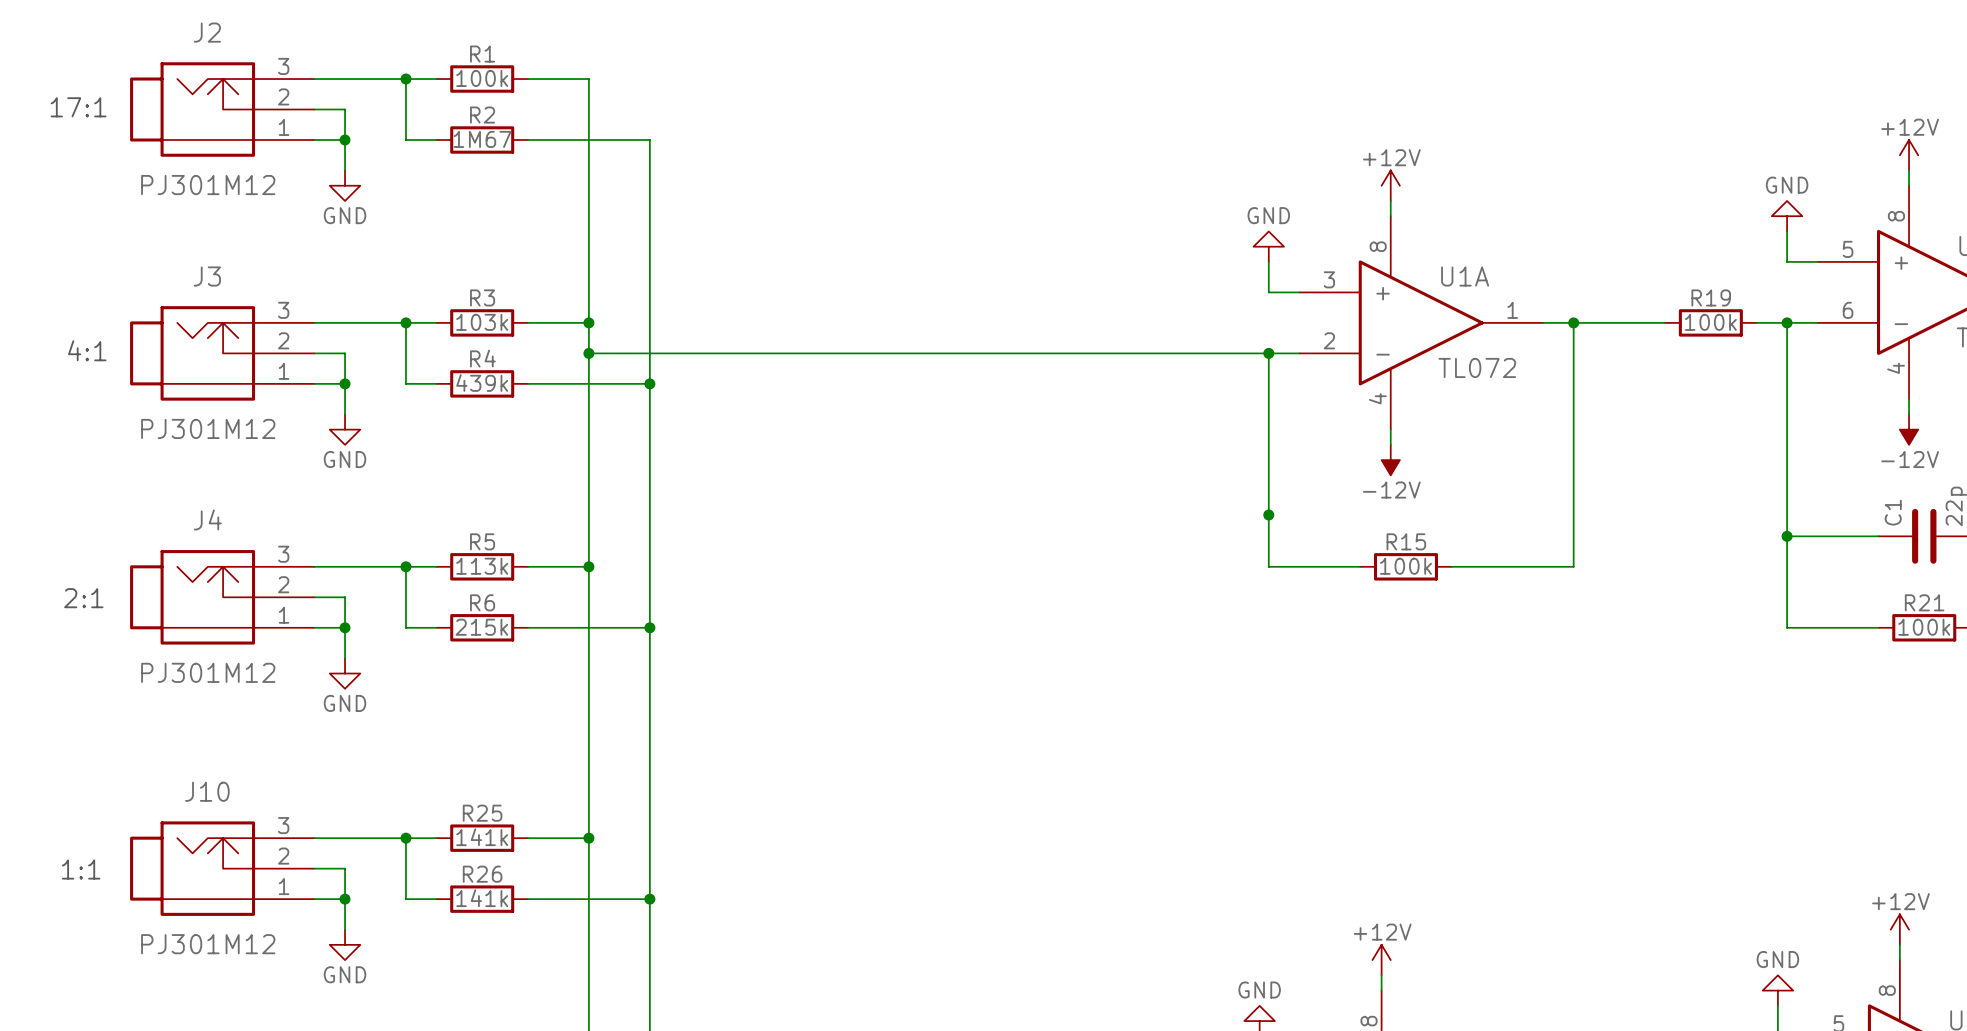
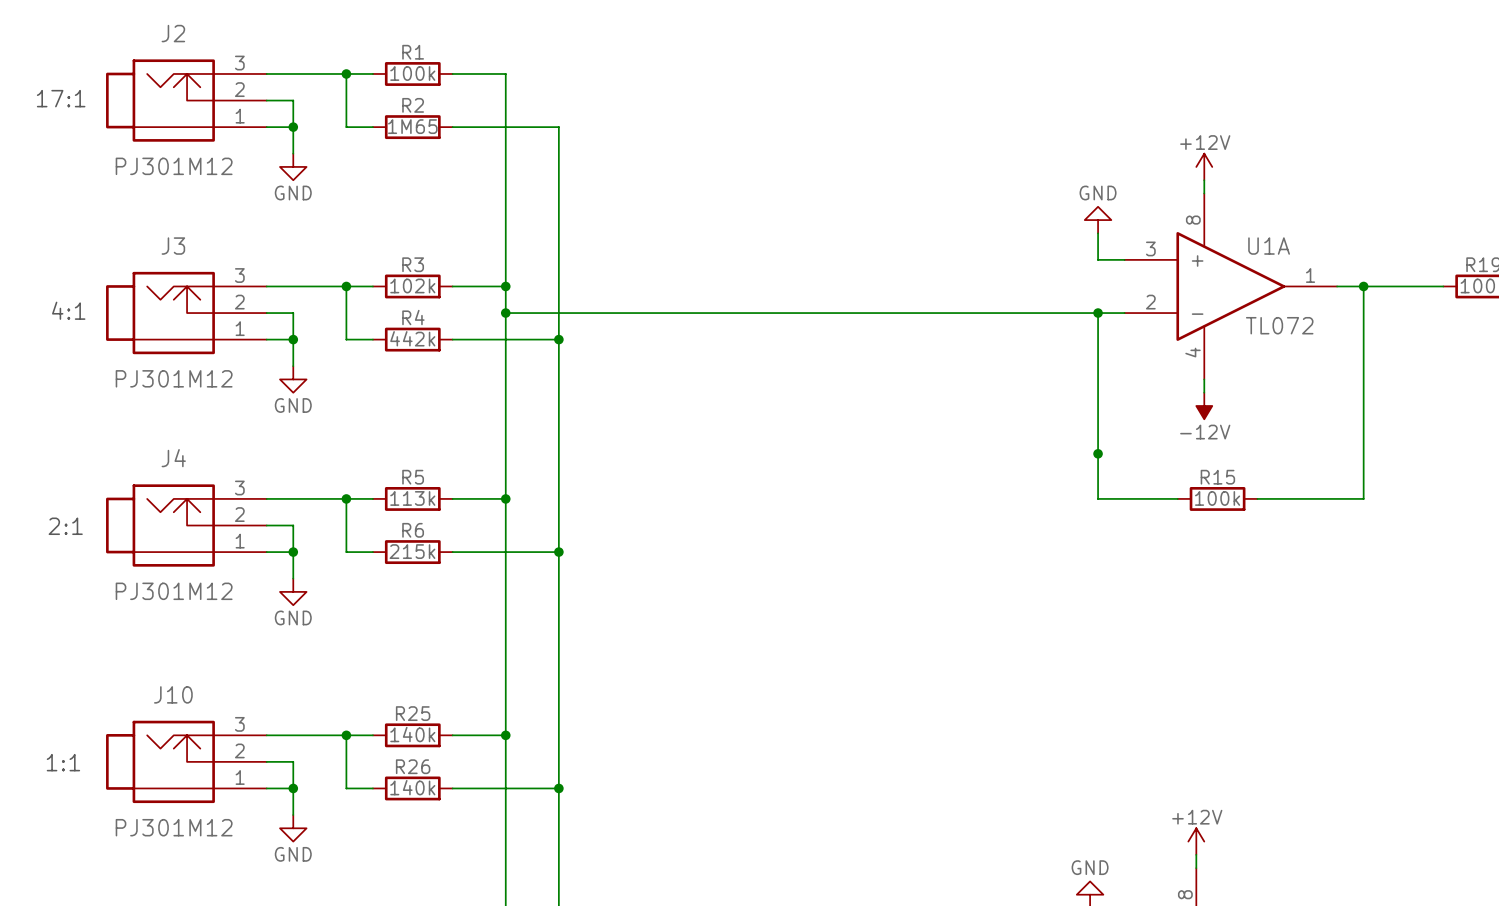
R2 value: 1M67 (482, 139) -> 1M65 (412, 126)
R3 value: 103k (482, 322) -> 102k (412, 285)
R4 value: 439k (482, 382) -> 442k (412, 338)
R25 value: 141k (482, 837) -> 140k (412, 734)
R26 value: 141k (482, 898) -> 140k (412, 787)

